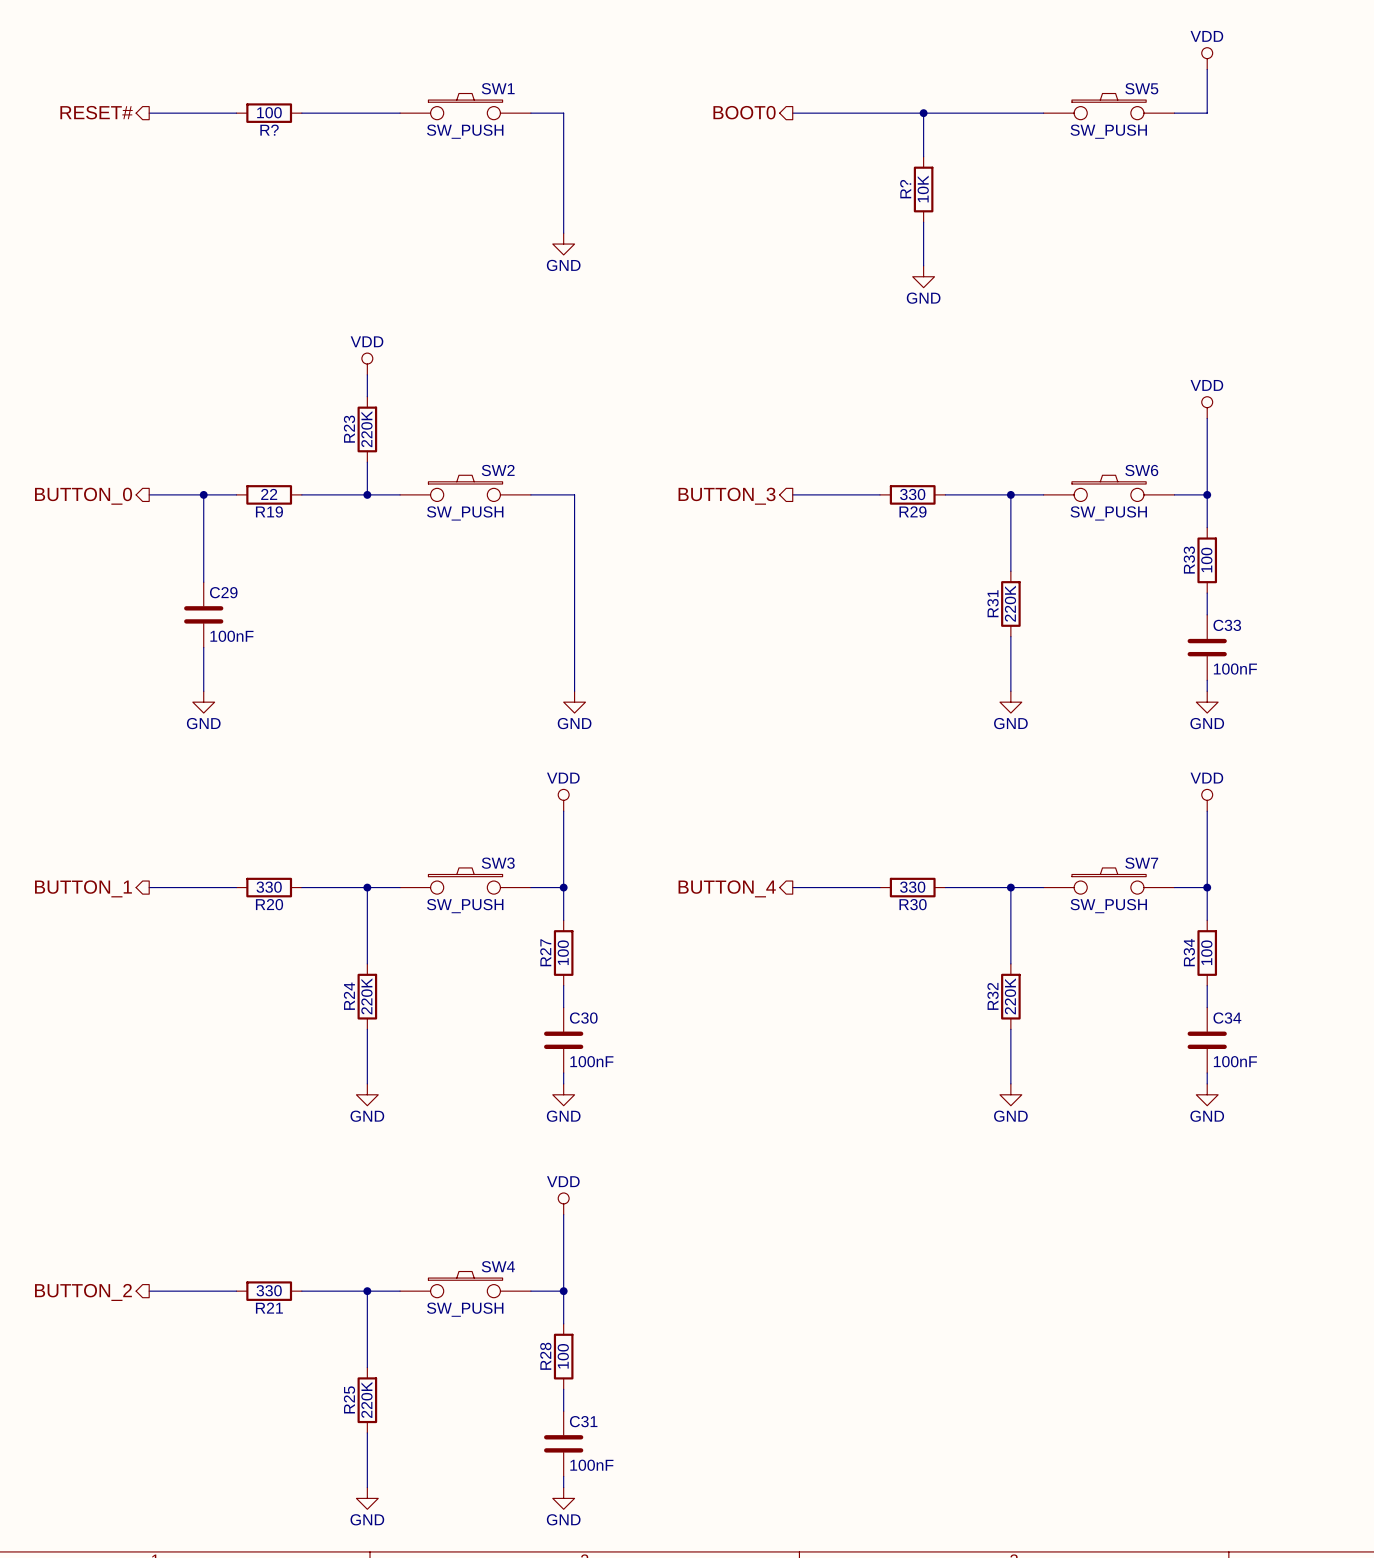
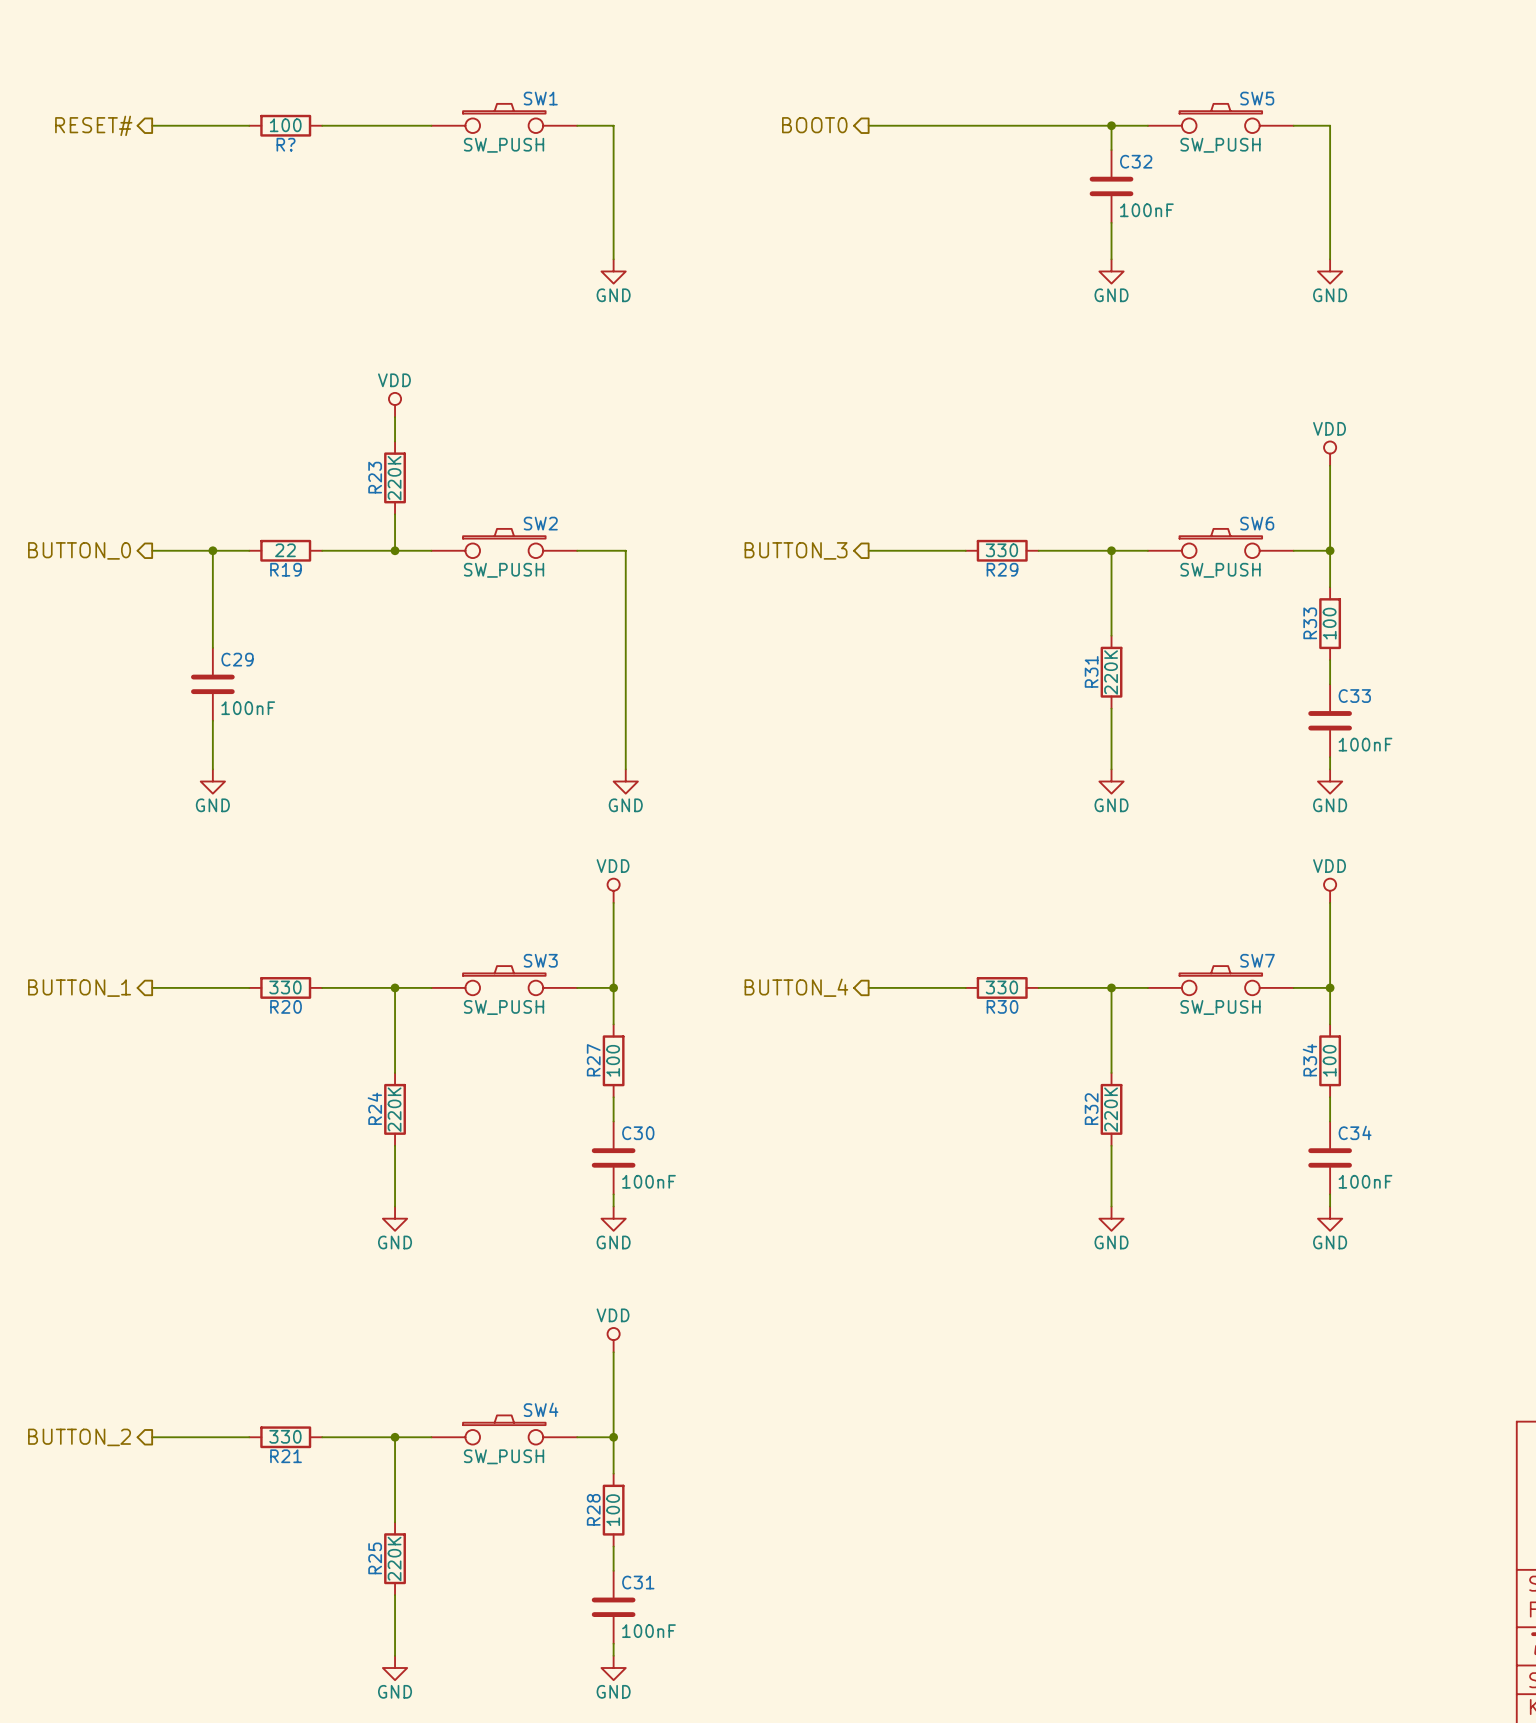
power symbol: VDD (1207, 58) -> none
wire: (1207, 69) (1207, 113) -> (1330, 259) (1330, 125)
wire: (923, 113) (923, 156) -> none
junction: (923, 113) -> none
wire: none -> (1111, 125) (1111, 150)
junction: none -> (1111, 125)
C32: none -> 100nF (1111, 186)
R?: 10K (923, 189) -> none
wire: none -> (1111, 222) (1111, 259)
wire: (923, 222) (923, 265) -> none
power symbol: none -> GND (1330, 271)
power symbol position: GND (923, 276) -> GND (1111, 271)

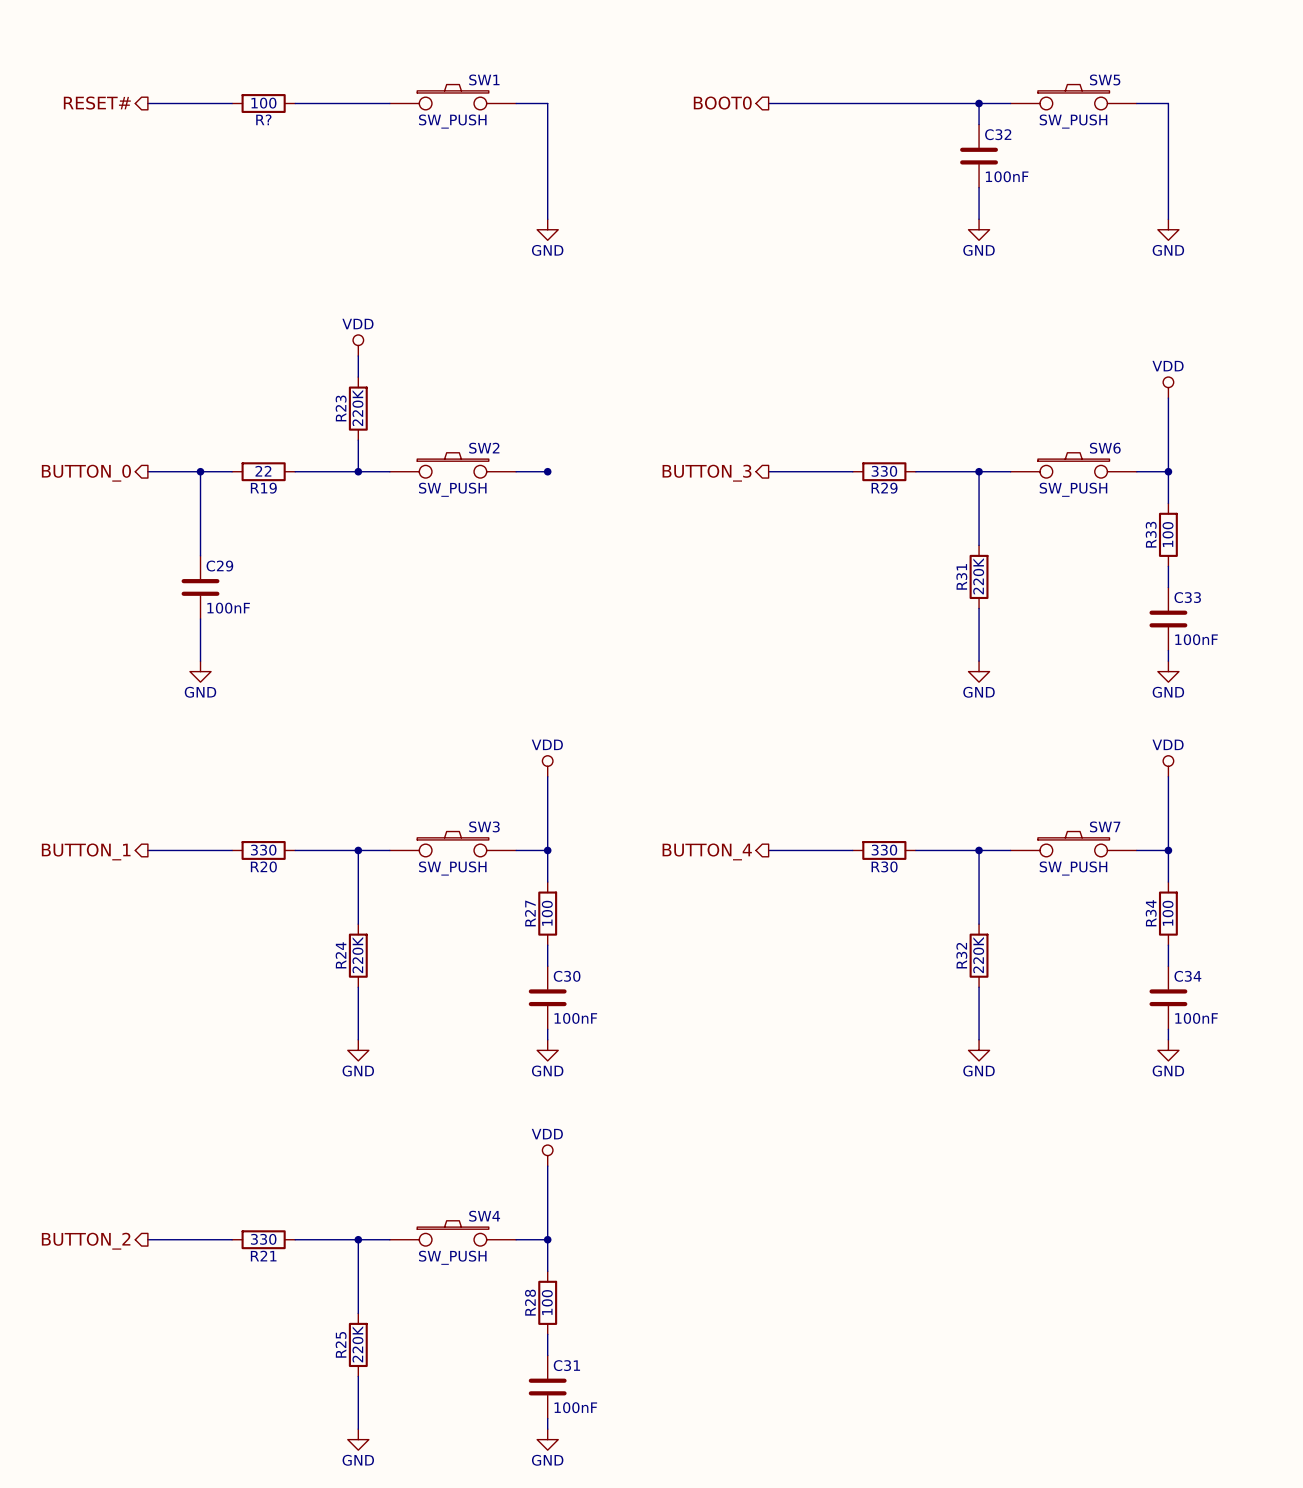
wire: (613, 550) (625, 550) (625, 769) -> none
junction: none -> (547, 471)
power symbol: GND (625, 781) -> none

